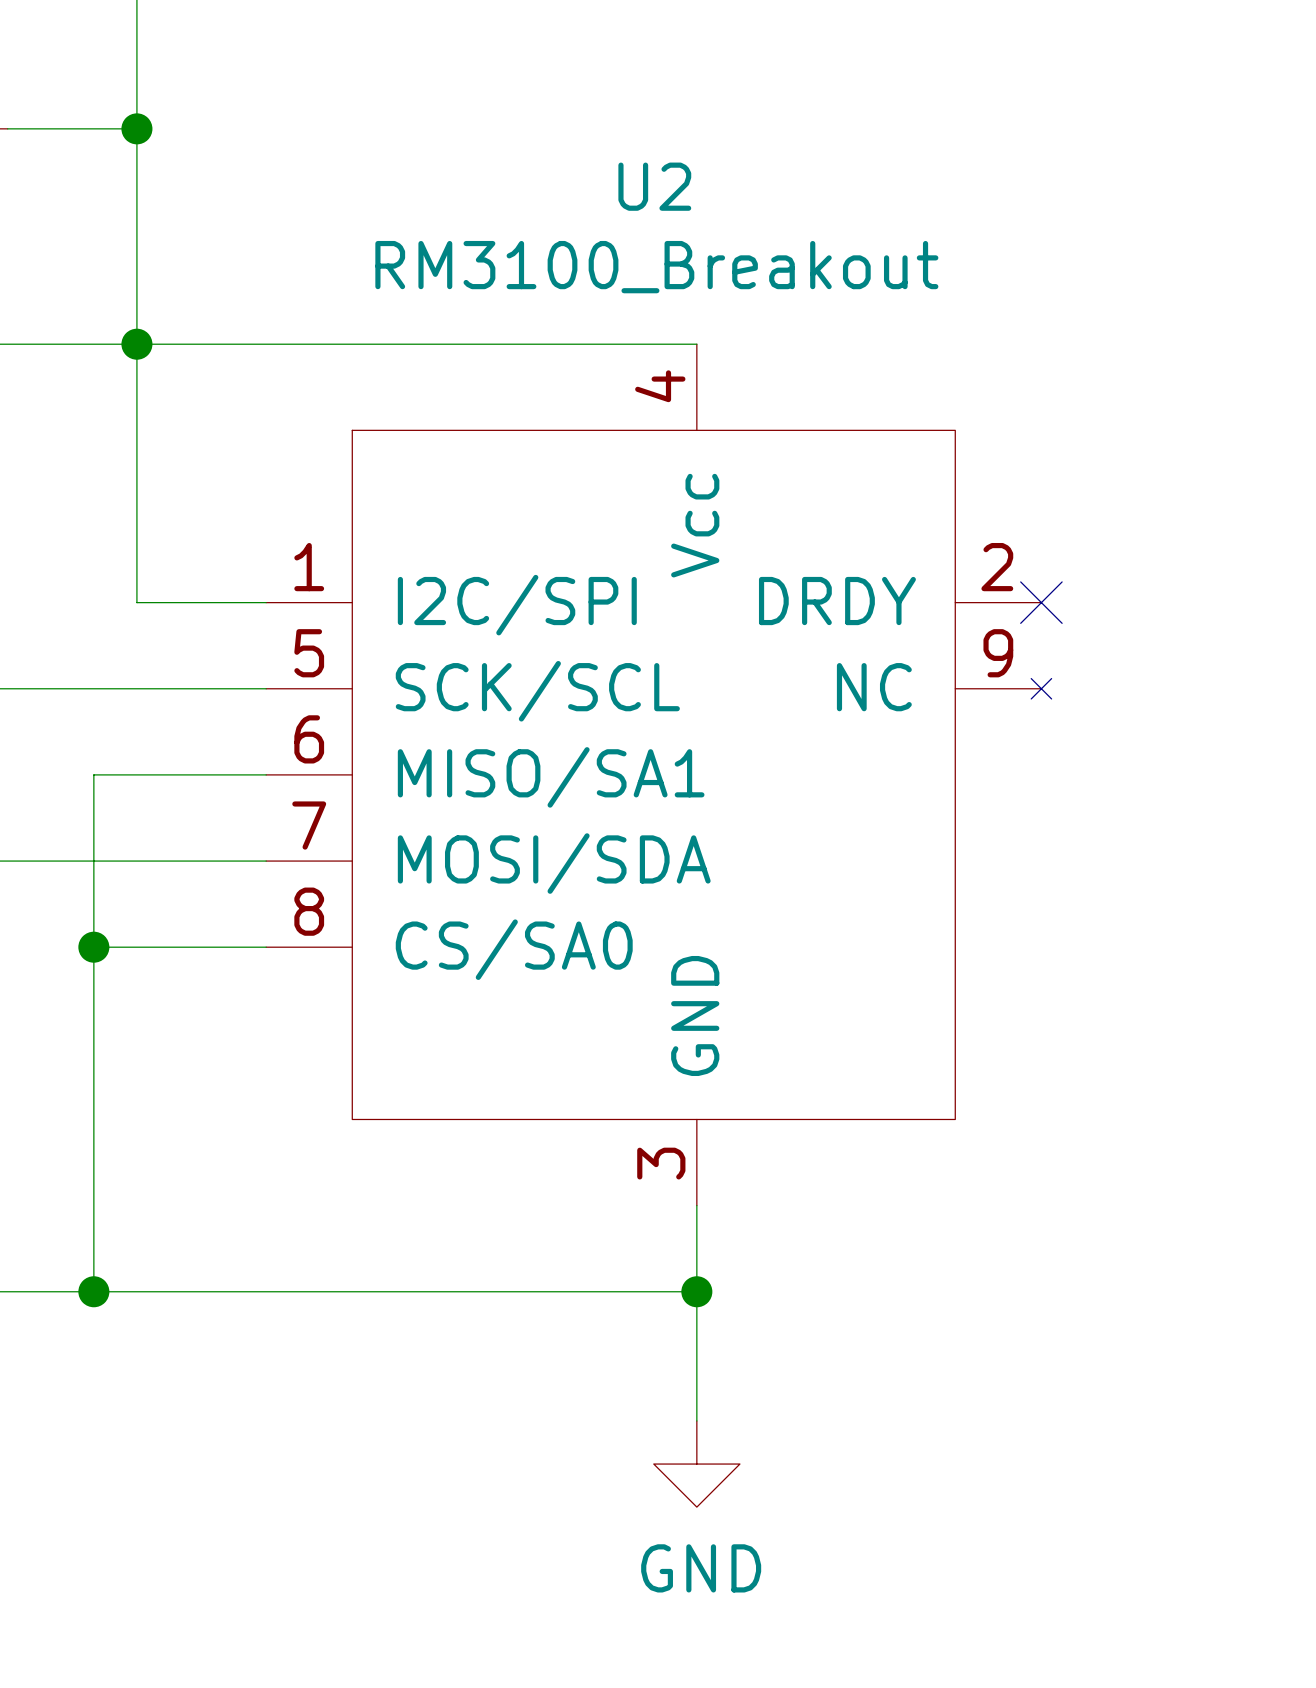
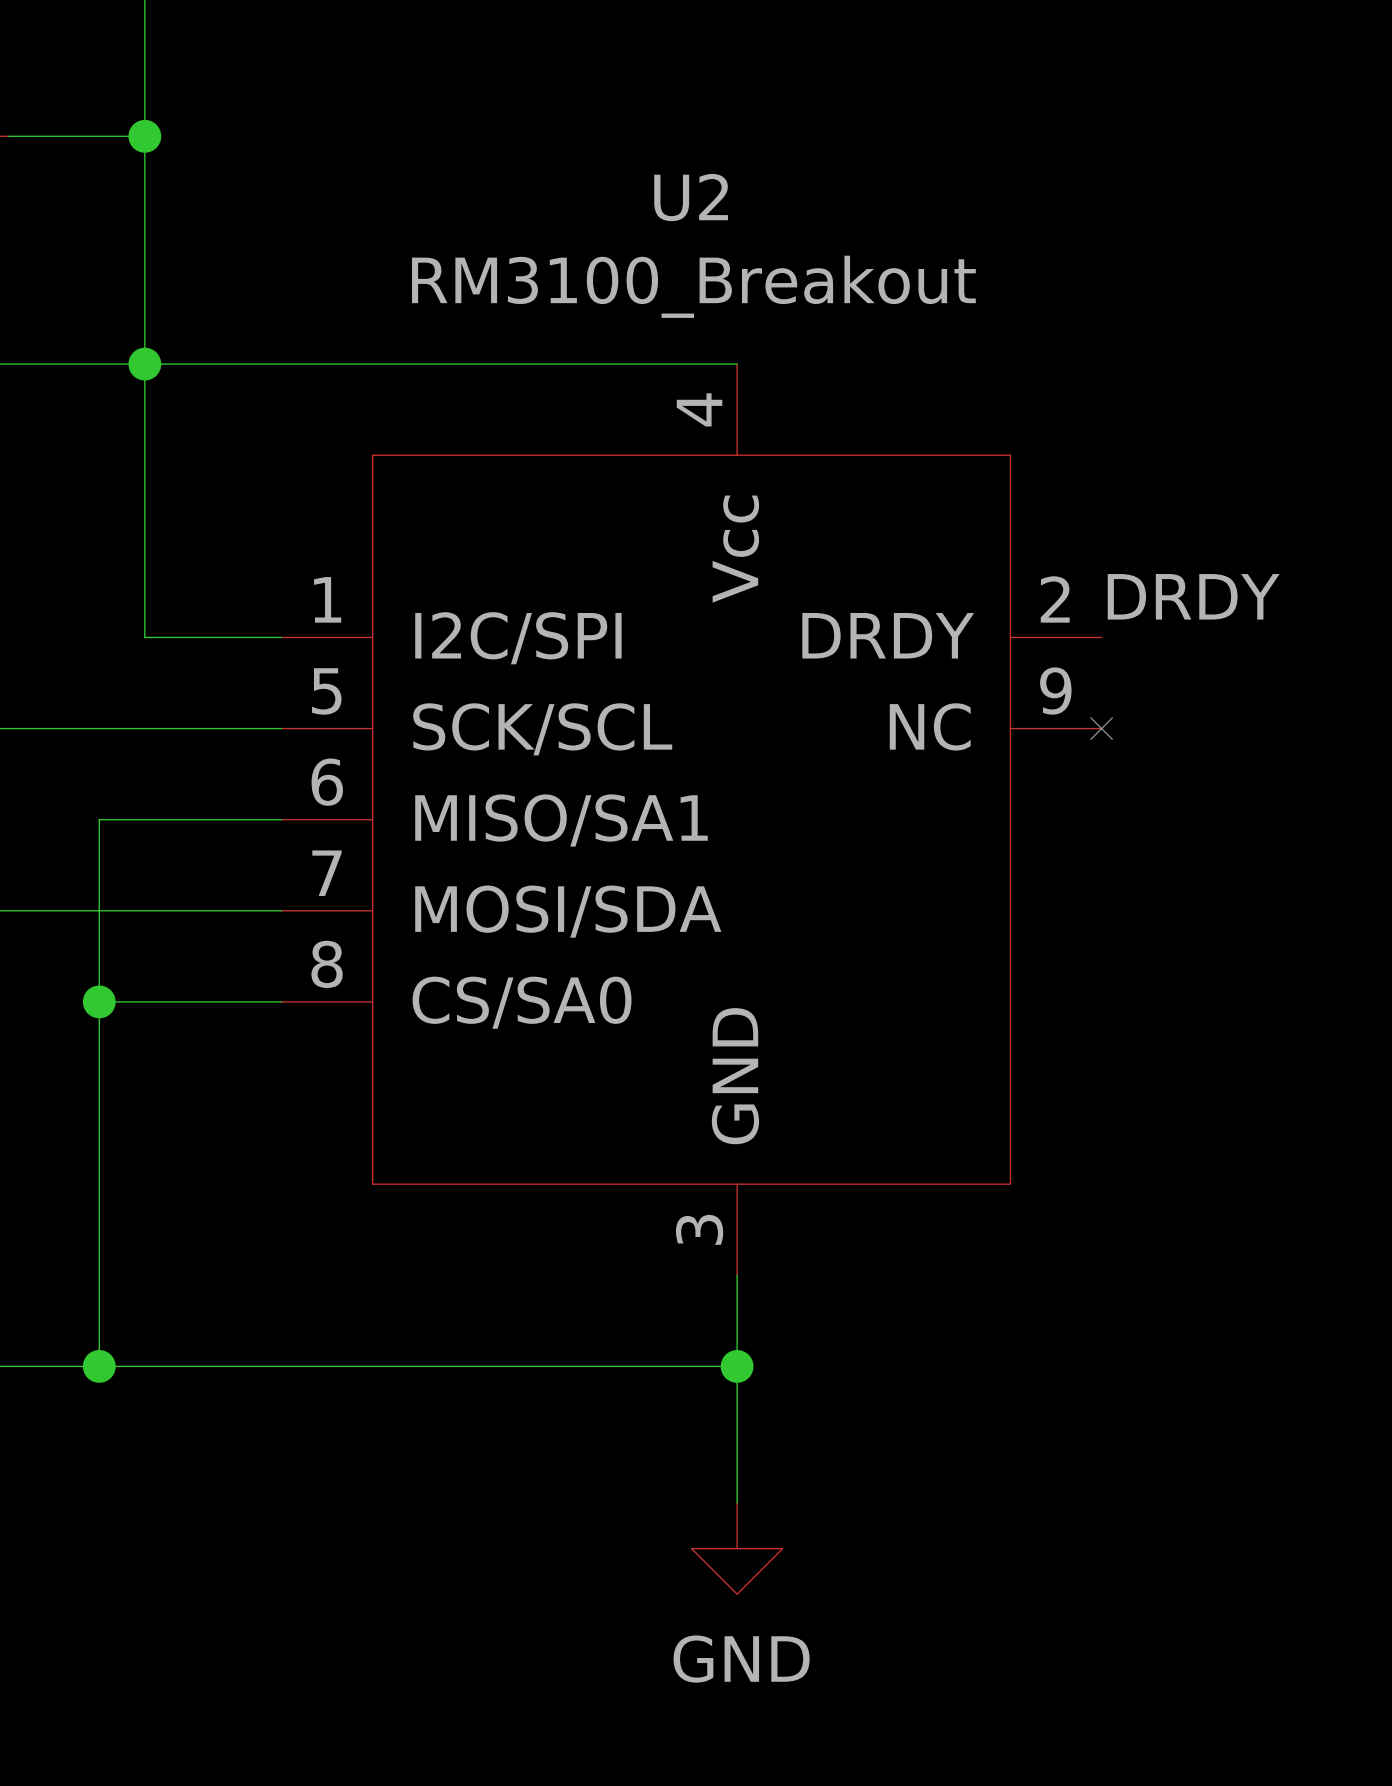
label: none -> DRDY (1193, 596)
no-connect mark: (1041, 602) -> none

